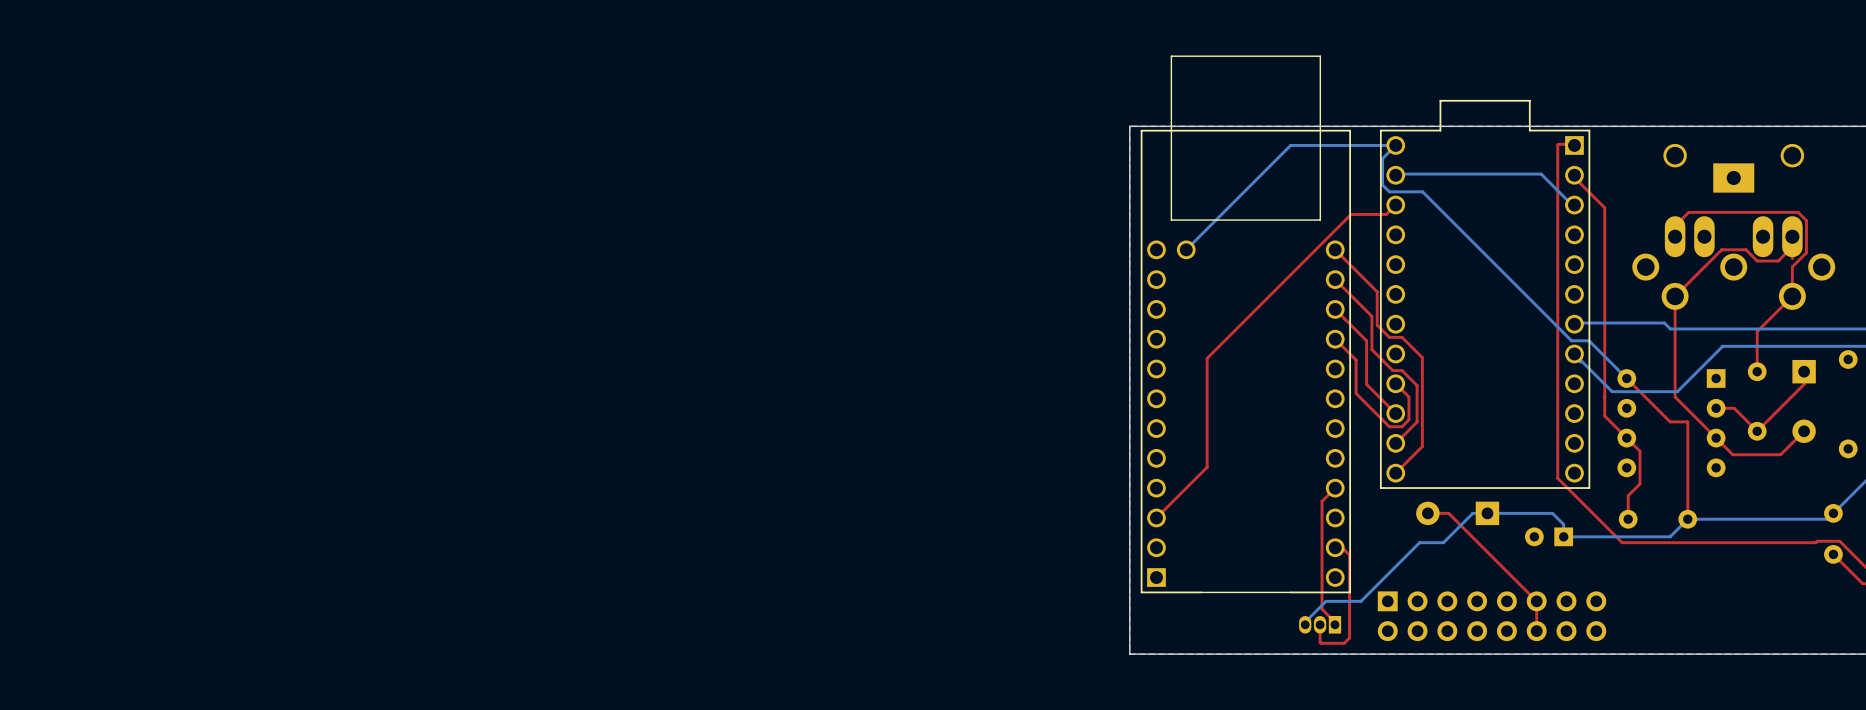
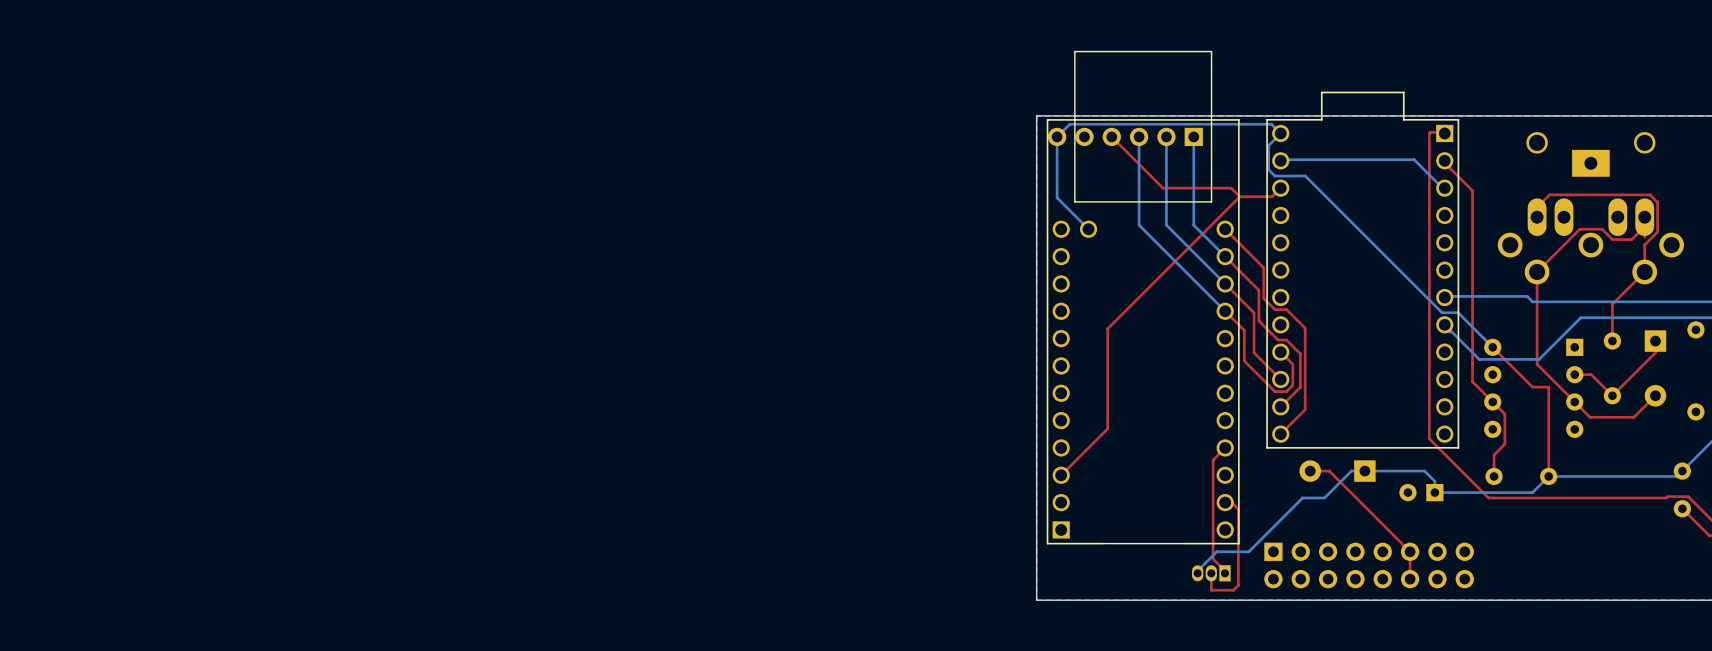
bottom track: (1395, 145) (1290, 145) (1186, 249) -> (1280, 133) (1271, 124) (1069, 124) (1057, 136) (1057, 197) (1088, 229)
top track: none -> (1111, 136) (1163, 188) (1231, 188) (1239, 196)
part: none -> (1125, 136)
bottom track: none -> (1139, 136) (1139, 225) (1225, 311)
bottom track: none -> (1166, 136) (1166, 225) (1225, 283)
bottom track: none -> (1193, 136) (1193, 225) (1225, 256)

